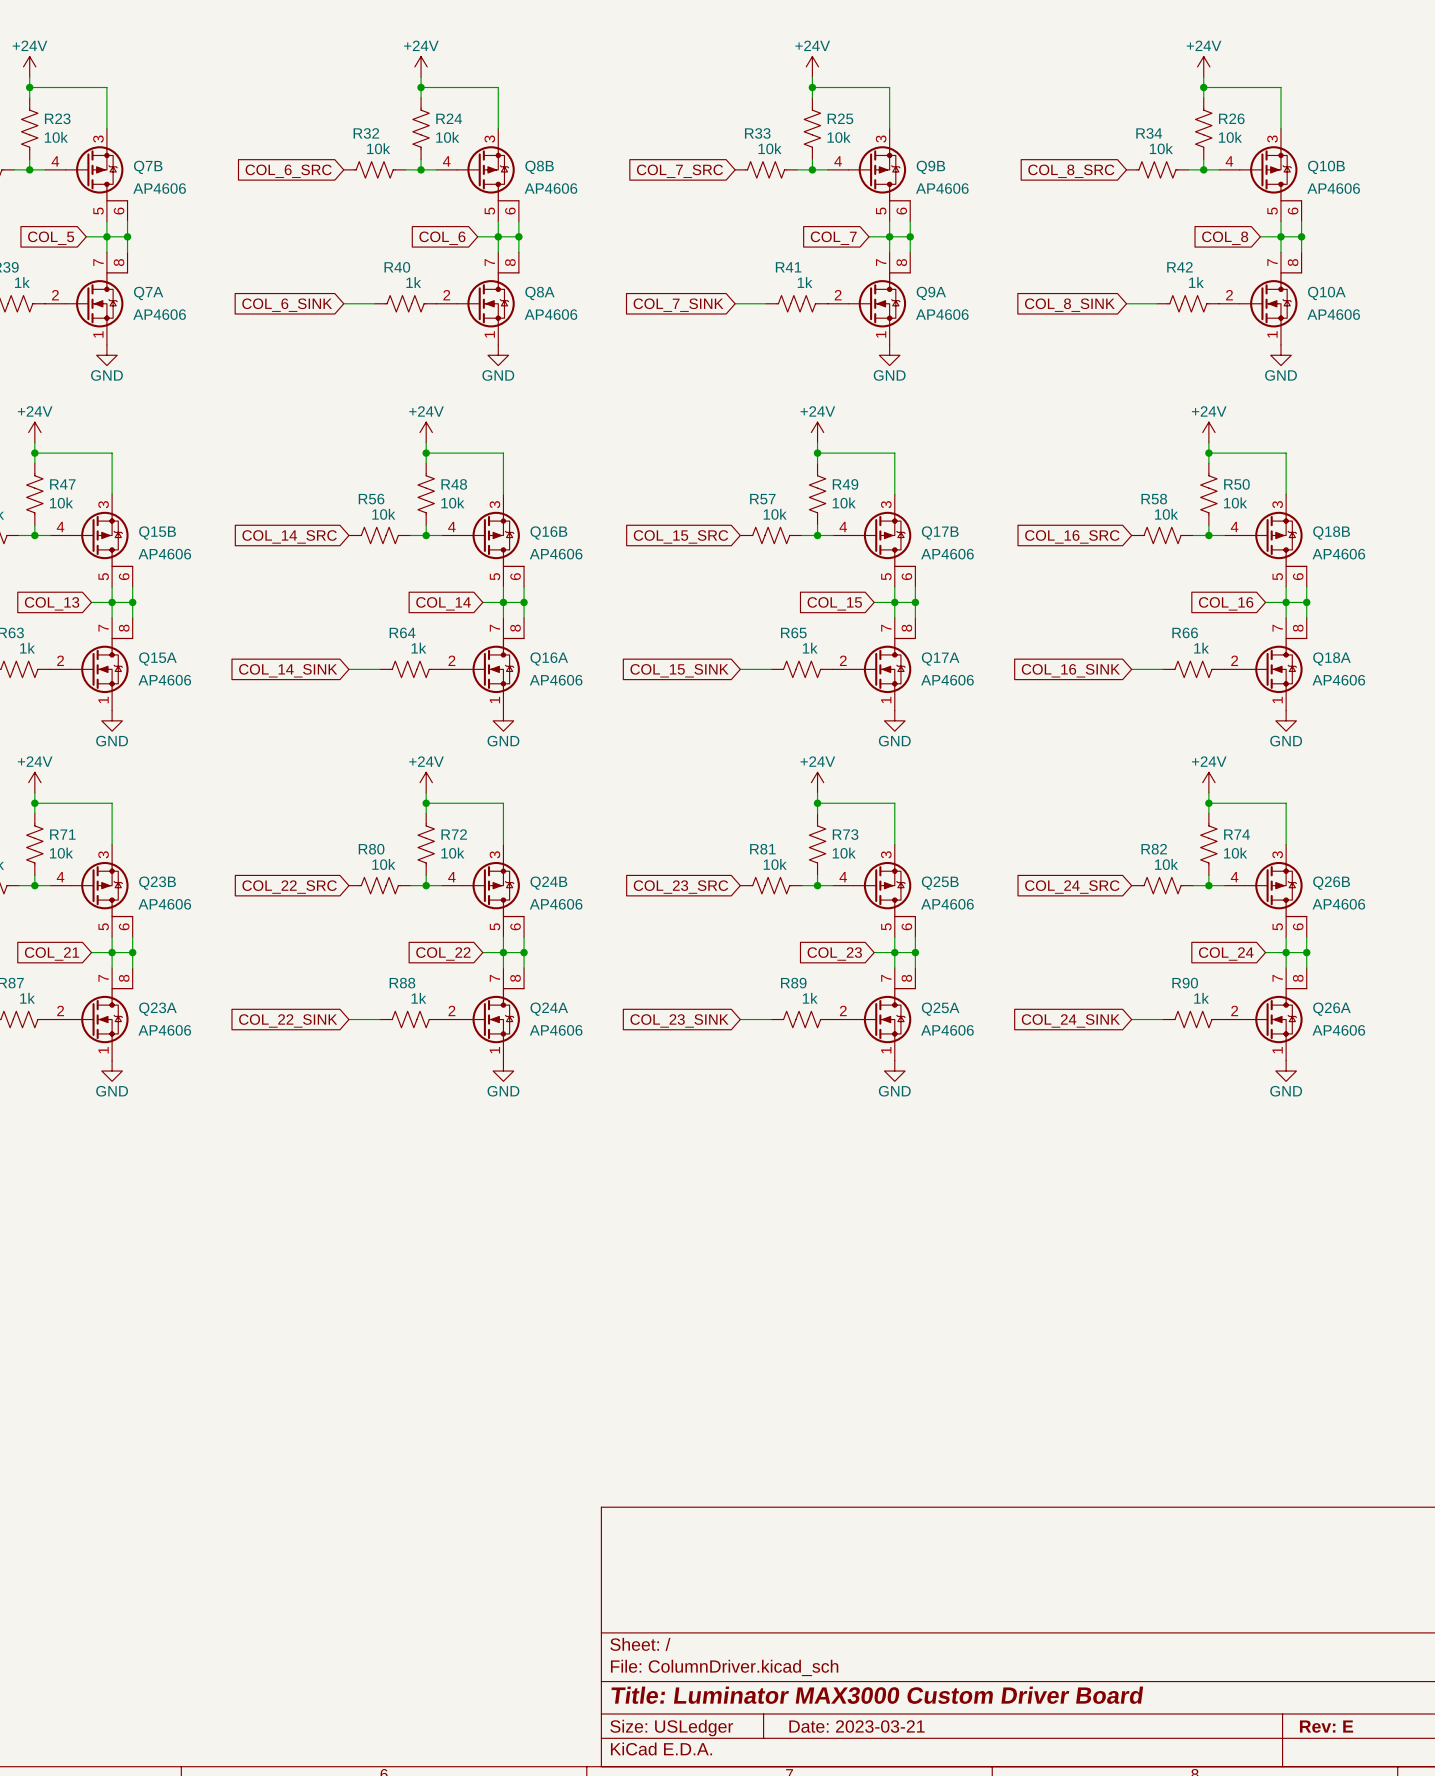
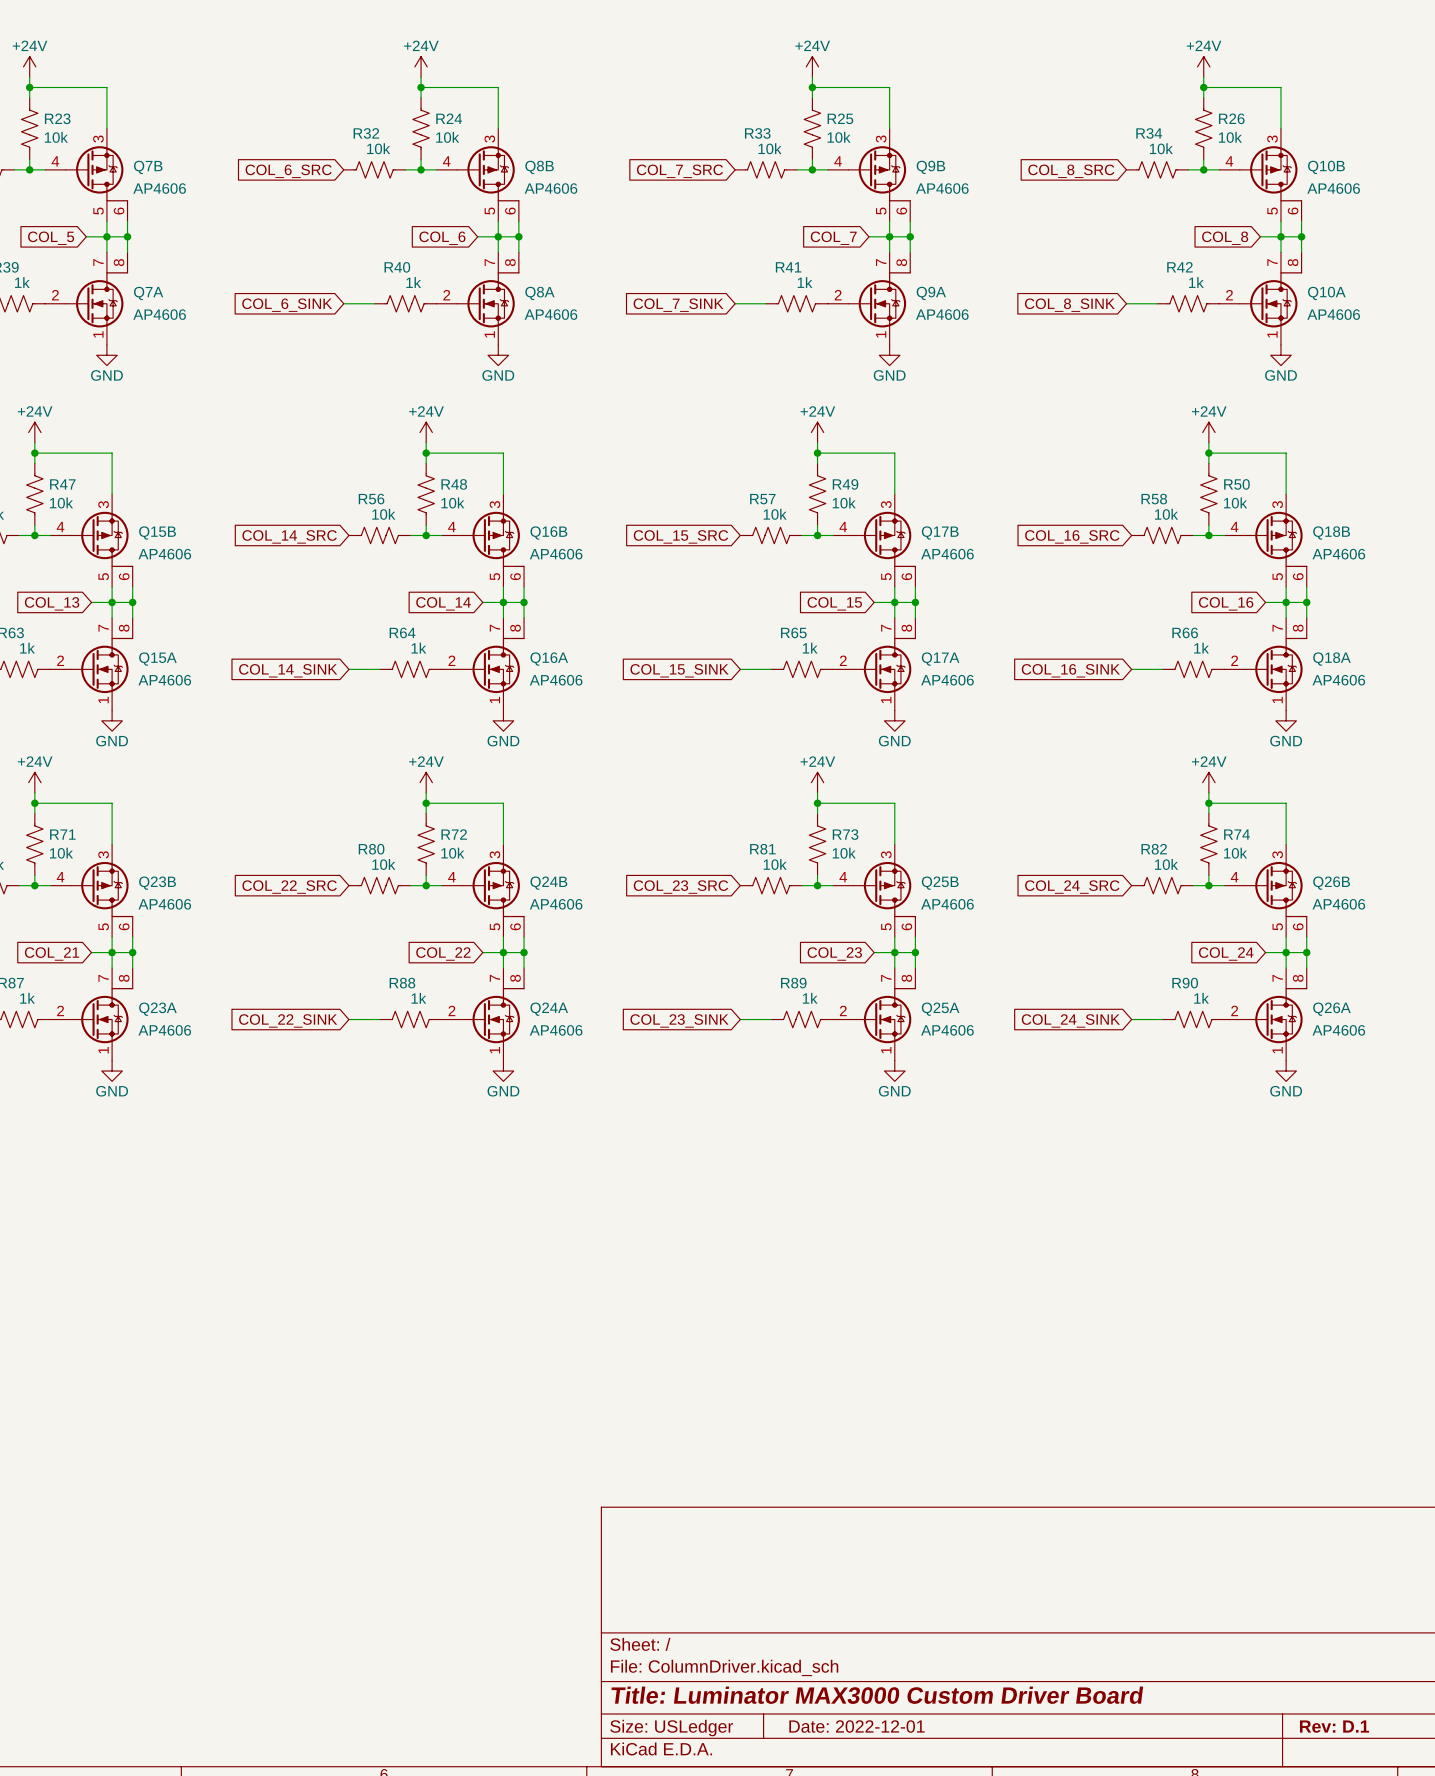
title block: Date: 2023-03-21 (857, 1726) -> Date: 2022-12-01 (857, 1726)
title block: Rev: E (1326, 1726) -> Rev: D.1 (1334, 1726)

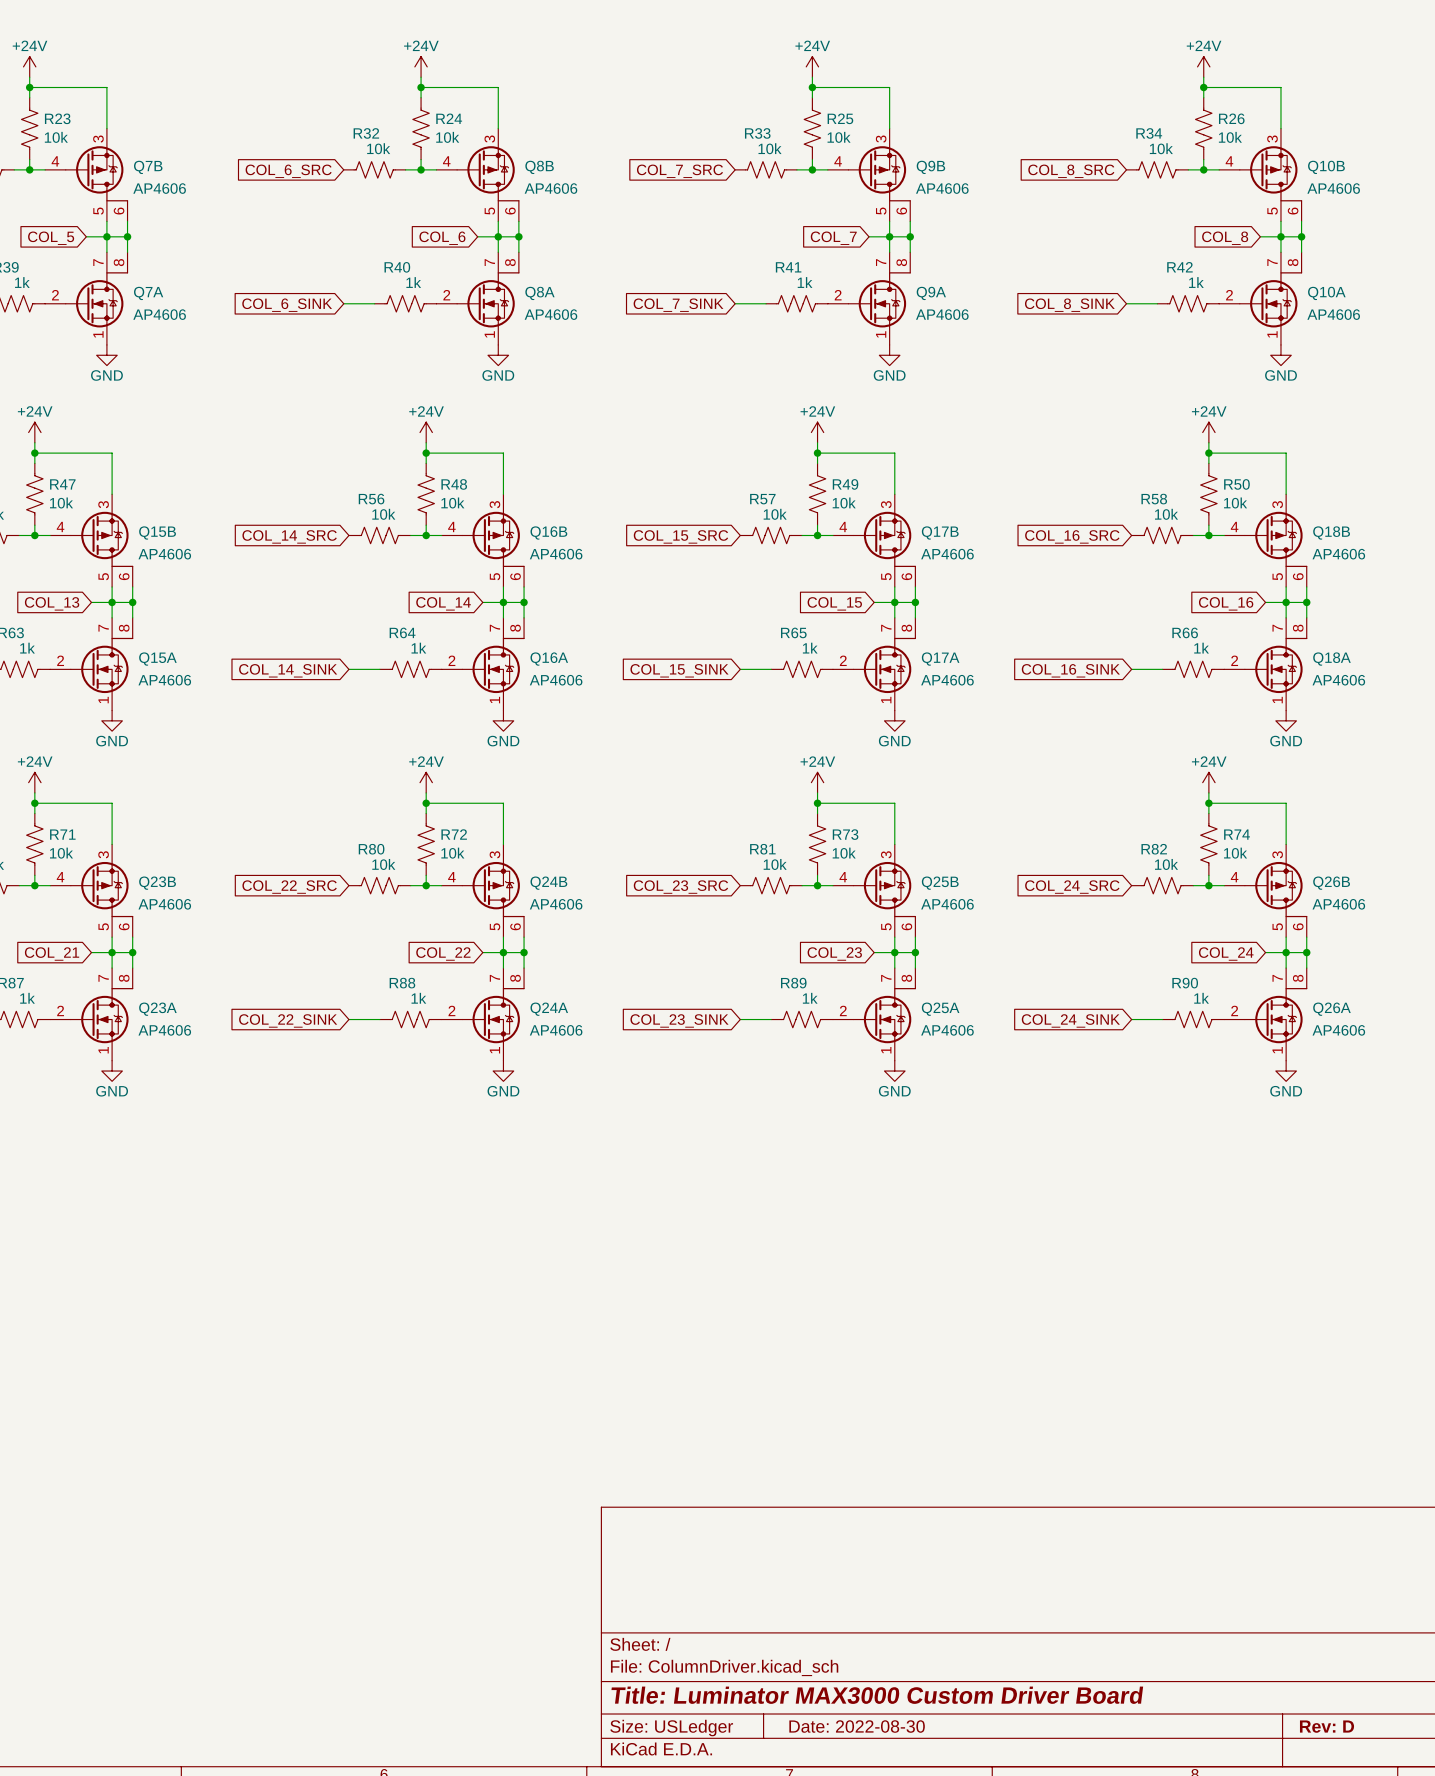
title block: Date: 2022-12-01 (857, 1726) -> Date: 2022-08-30 (857, 1726)
title block: Rev: D.1 (1334, 1726) -> Rev: D (1327, 1726)

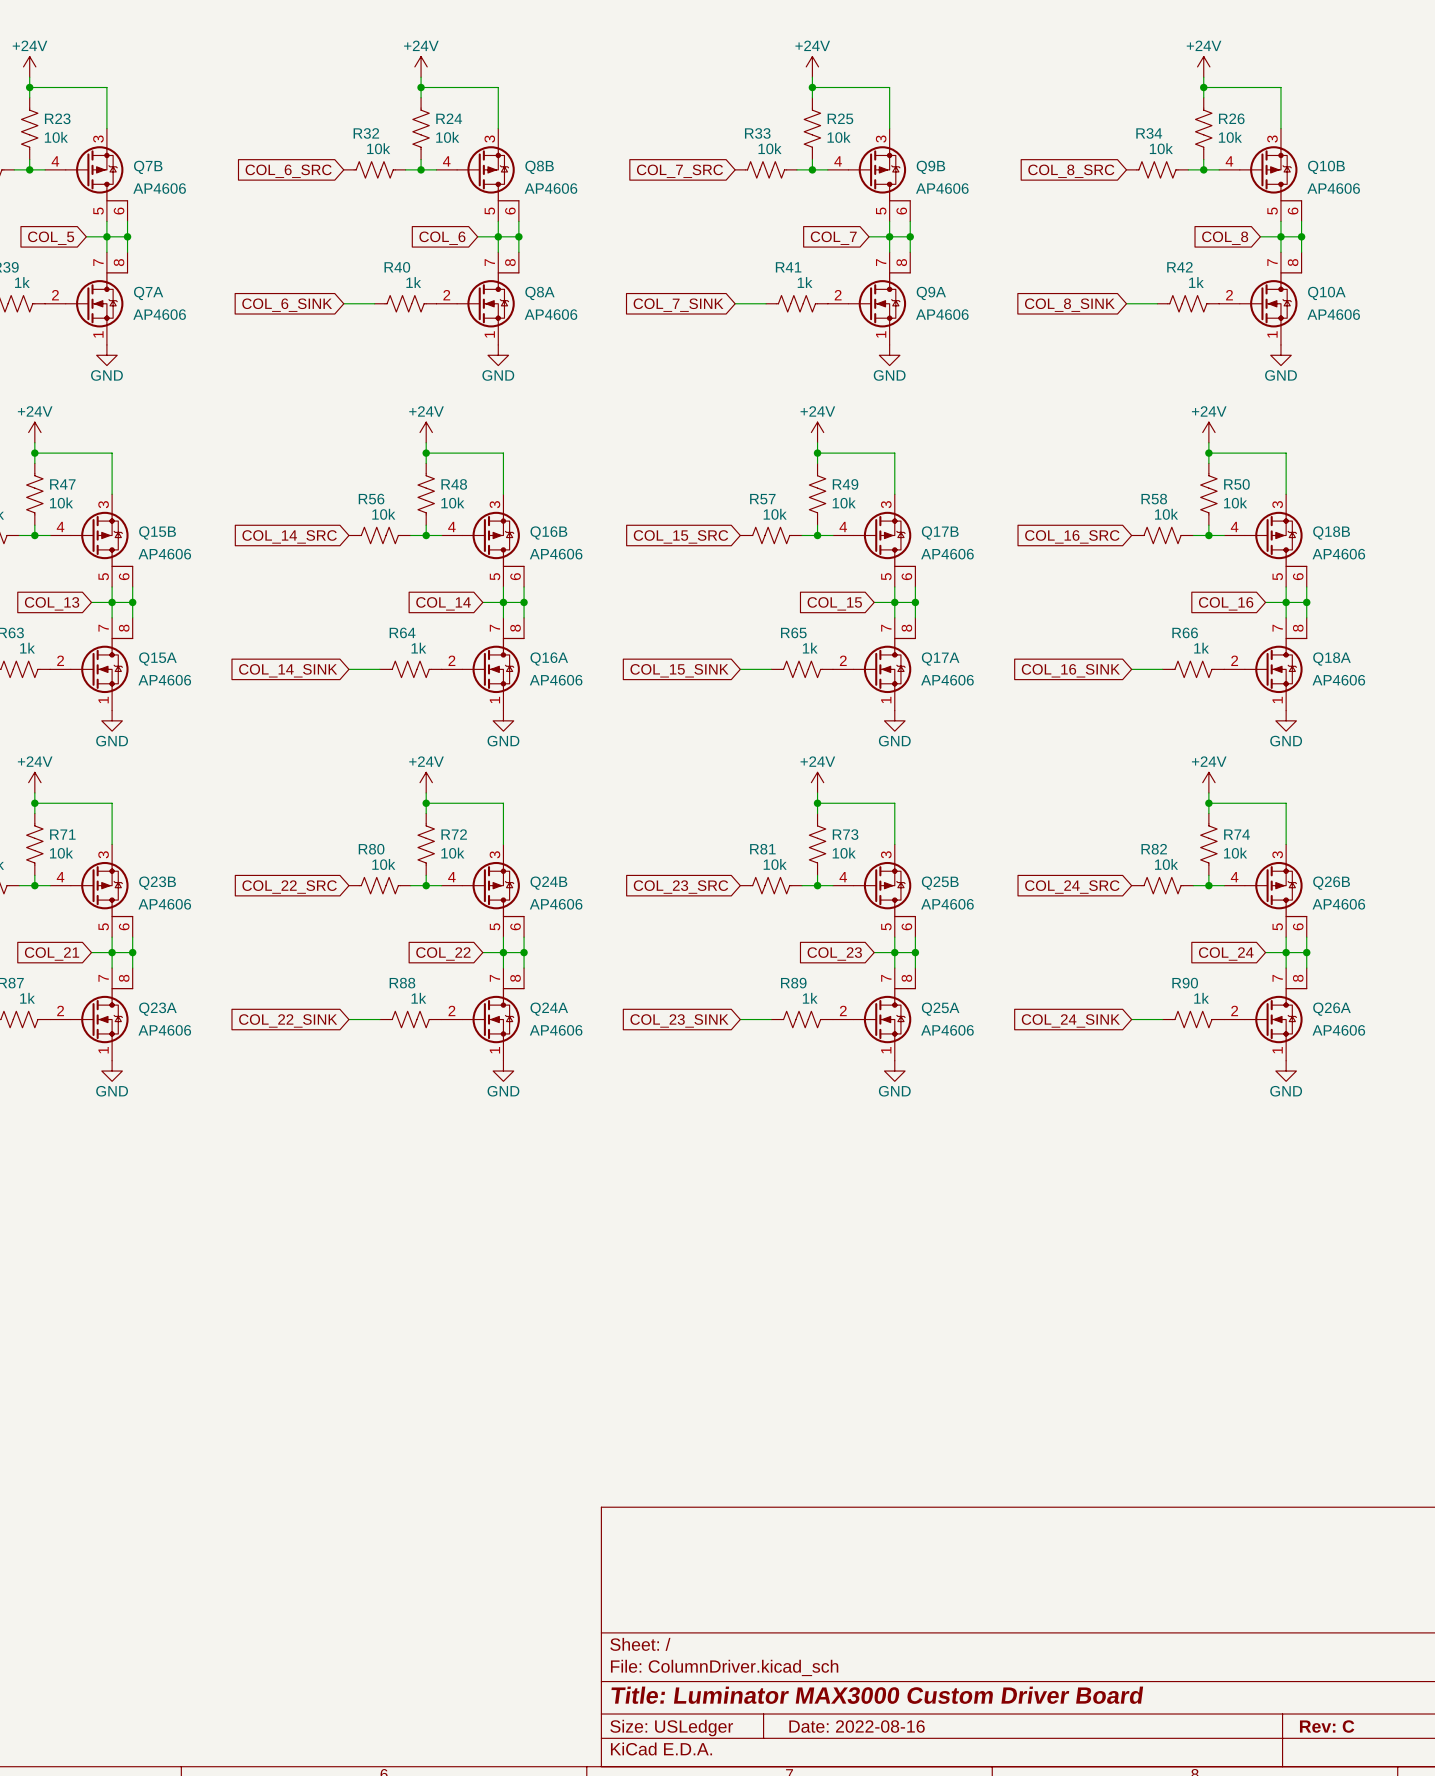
title block: Date: 2022-08-30 (857, 1726) -> Date: 2022-08-16 (857, 1726)
title block: Rev: D (1327, 1726) -> Rev: C (1327, 1726)

